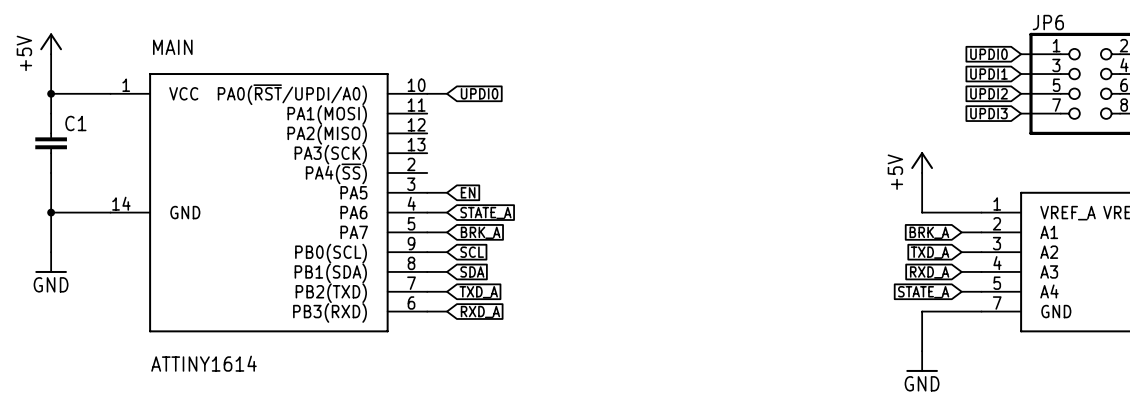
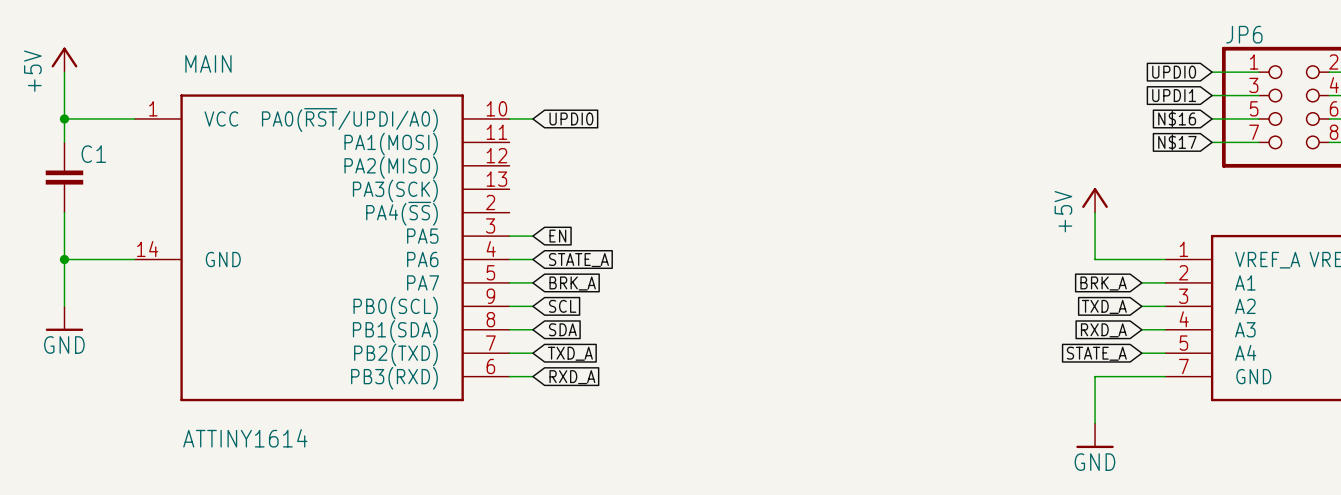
global label: UPDI2 (988, 93) -> N$16 (1177, 118)
global label: UPDI3 (988, 113) -> N$17 (1177, 142)

